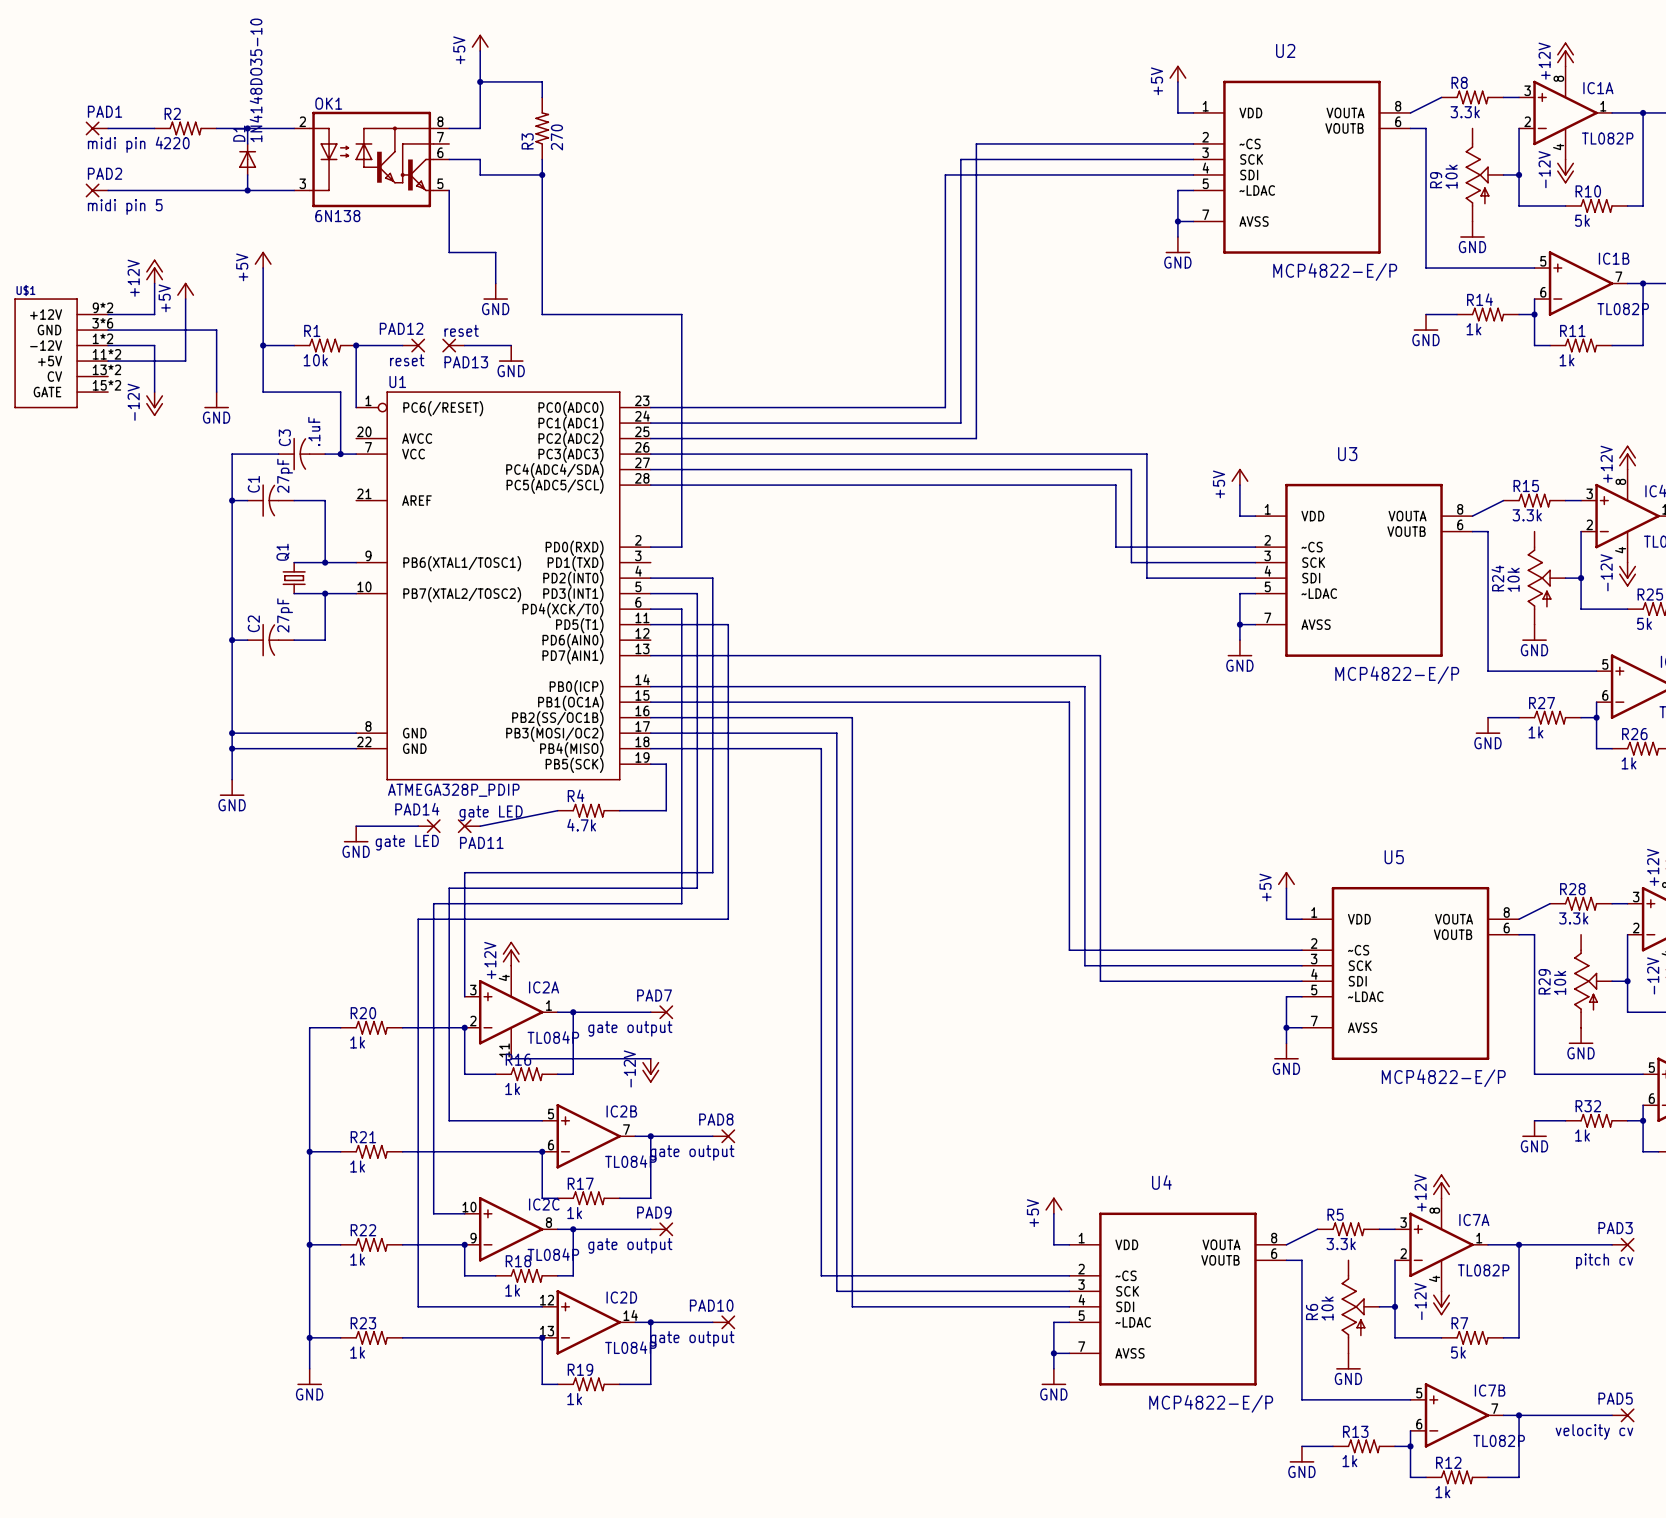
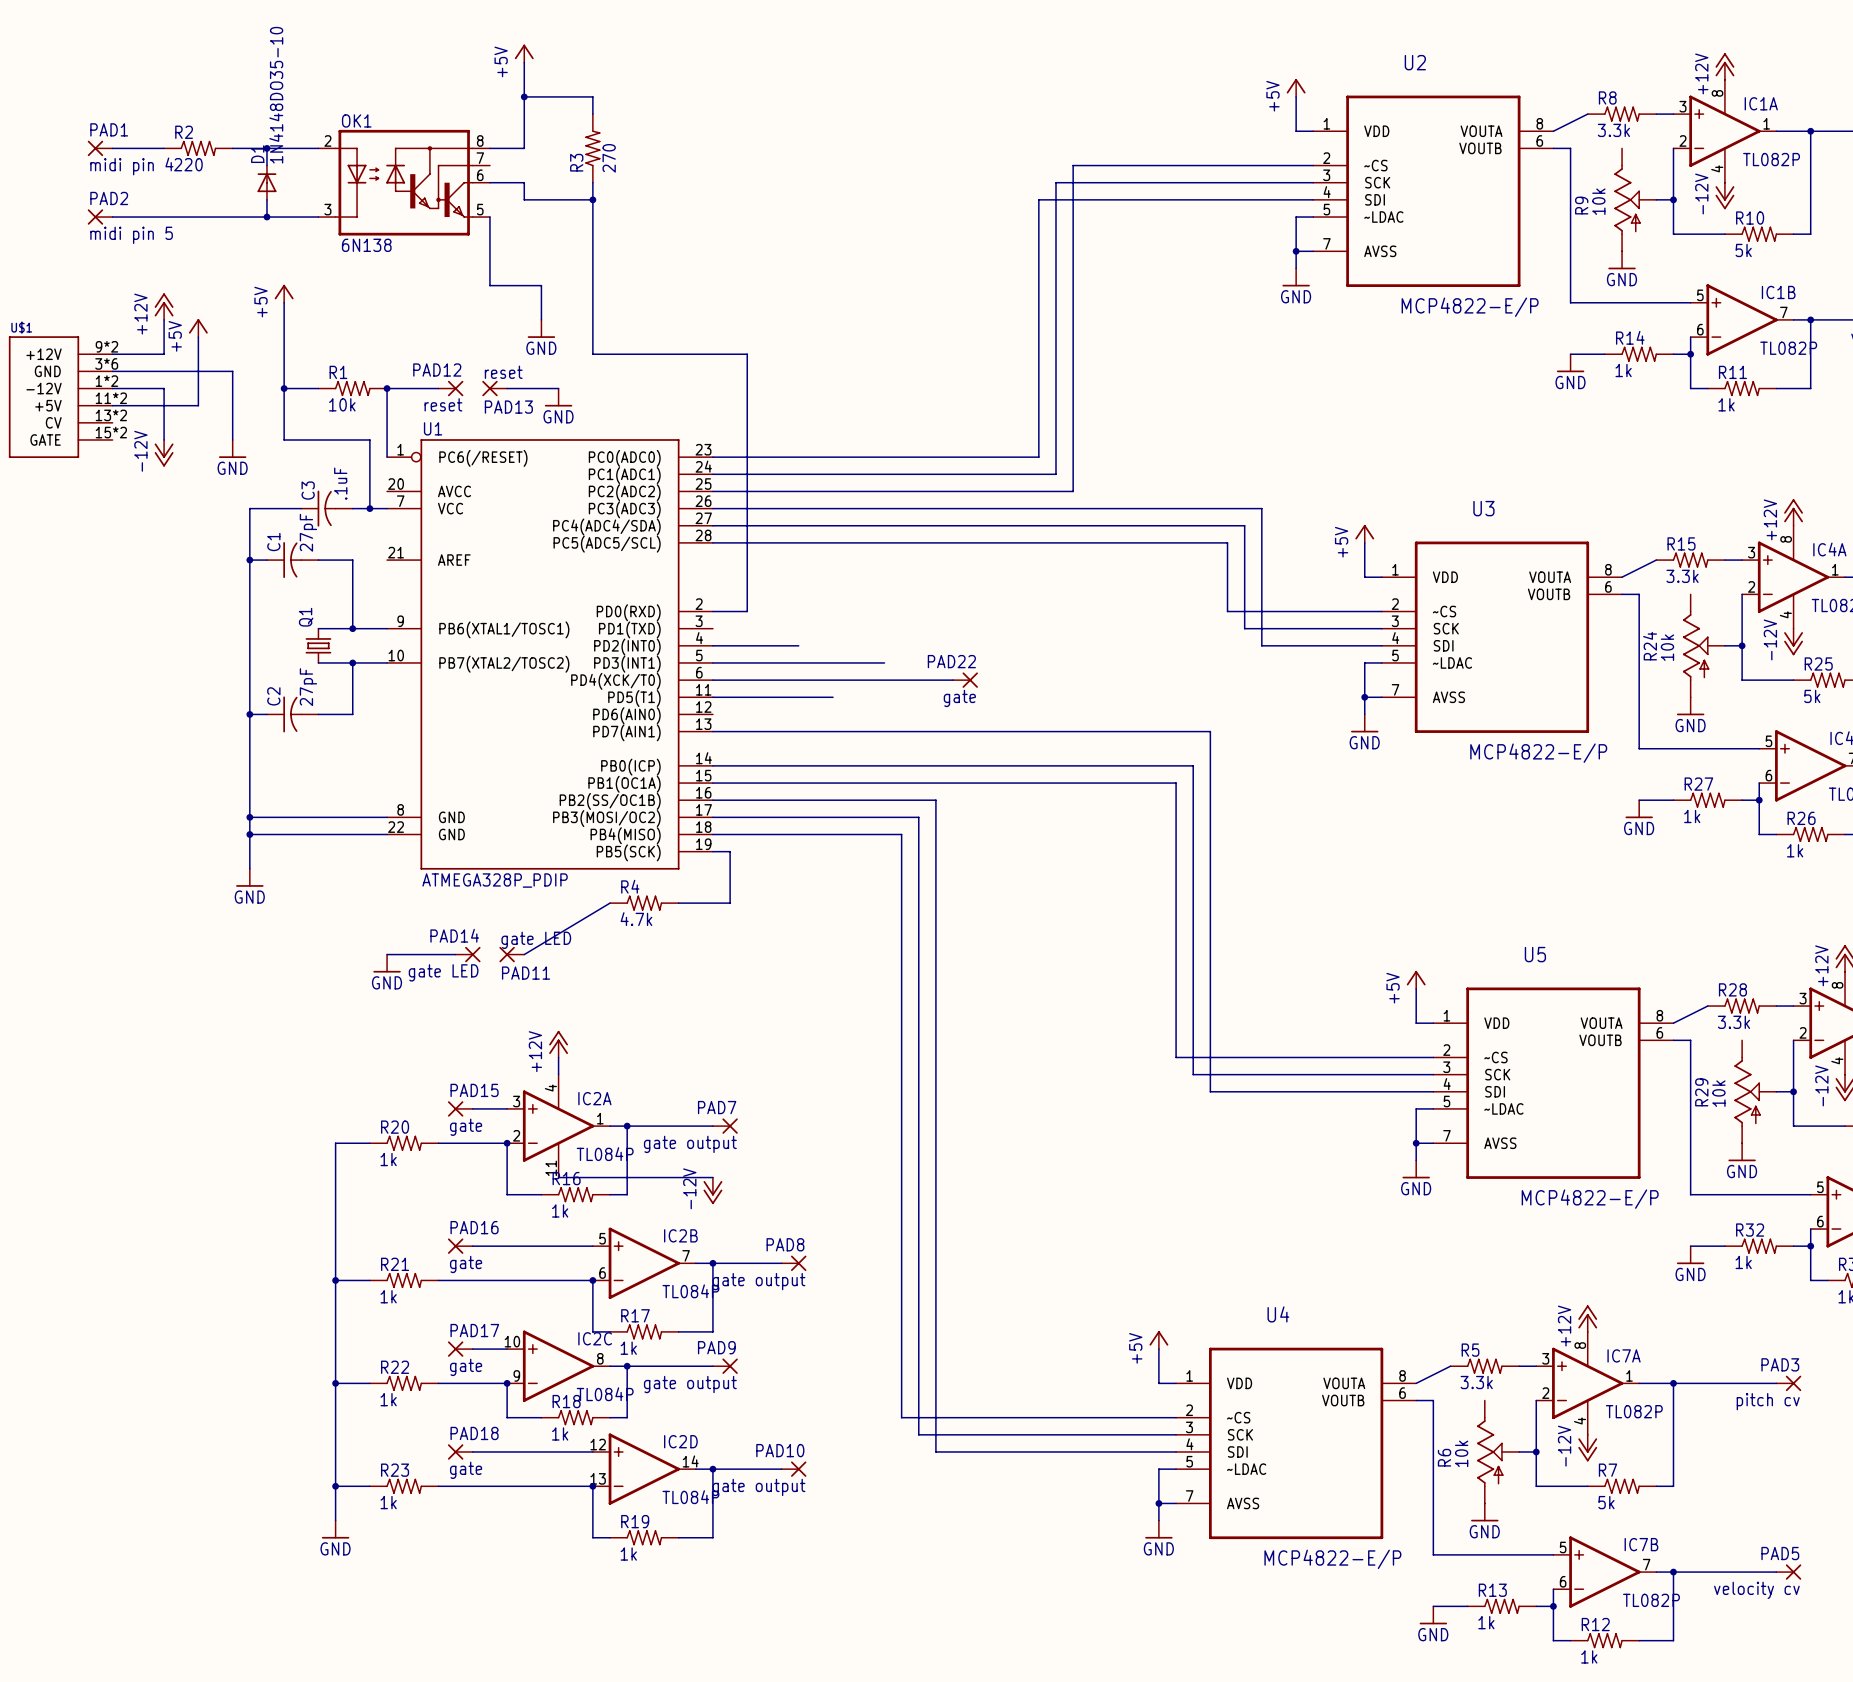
wire: (712, 578) (712, 872) (464, 872) (464, 996) -> (781, 645) (798, 645)
wire: (697, 593) (697, 888) (449, 888) (449, 1120) -> (472, 1246) (489, 1246)
wire: none -> (764, 662) (884, 662)
wire: (681, 609) (681, 903) (433, 903) (433, 1213) -> (747, 680) (953, 680)
PAD22: none -> gate (965, 680)
wire: (728, 624) (728, 919) (418, 919) (418, 1306) (433, 1306) -> (798, 697) (833, 697)
wire: (557, 810) (480, 826) -> (610, 903) (524, 954)
wire: (356, 826) (418, 826) -> (387, 954) (455, 954)
PAD14 position: (429, 826) -> (468, 954)
PAD11 position: (468, 826) -> (511, 954)
power symbol position: GND (356, 834) -> GND (387, 963)
power symbol position: +12V (511, 953) -> +12V (558, 1044)
PAD15: none -> gate (460, 1108)
wire: none -> (472, 1108) (507, 1108)
PAD16: none -> gate (460, 1246)
PAD17: none -> gate (460, 1349)
PAD18: none -> gate (460, 1451)

